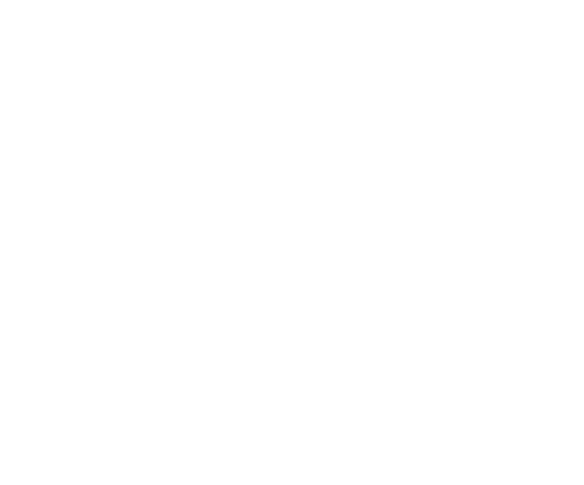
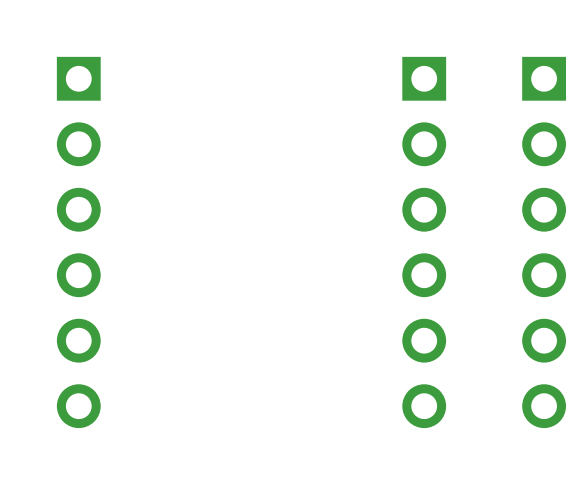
part: none -> (78, 242)
part: none -> (424, 242)
part: none -> (544, 242)

